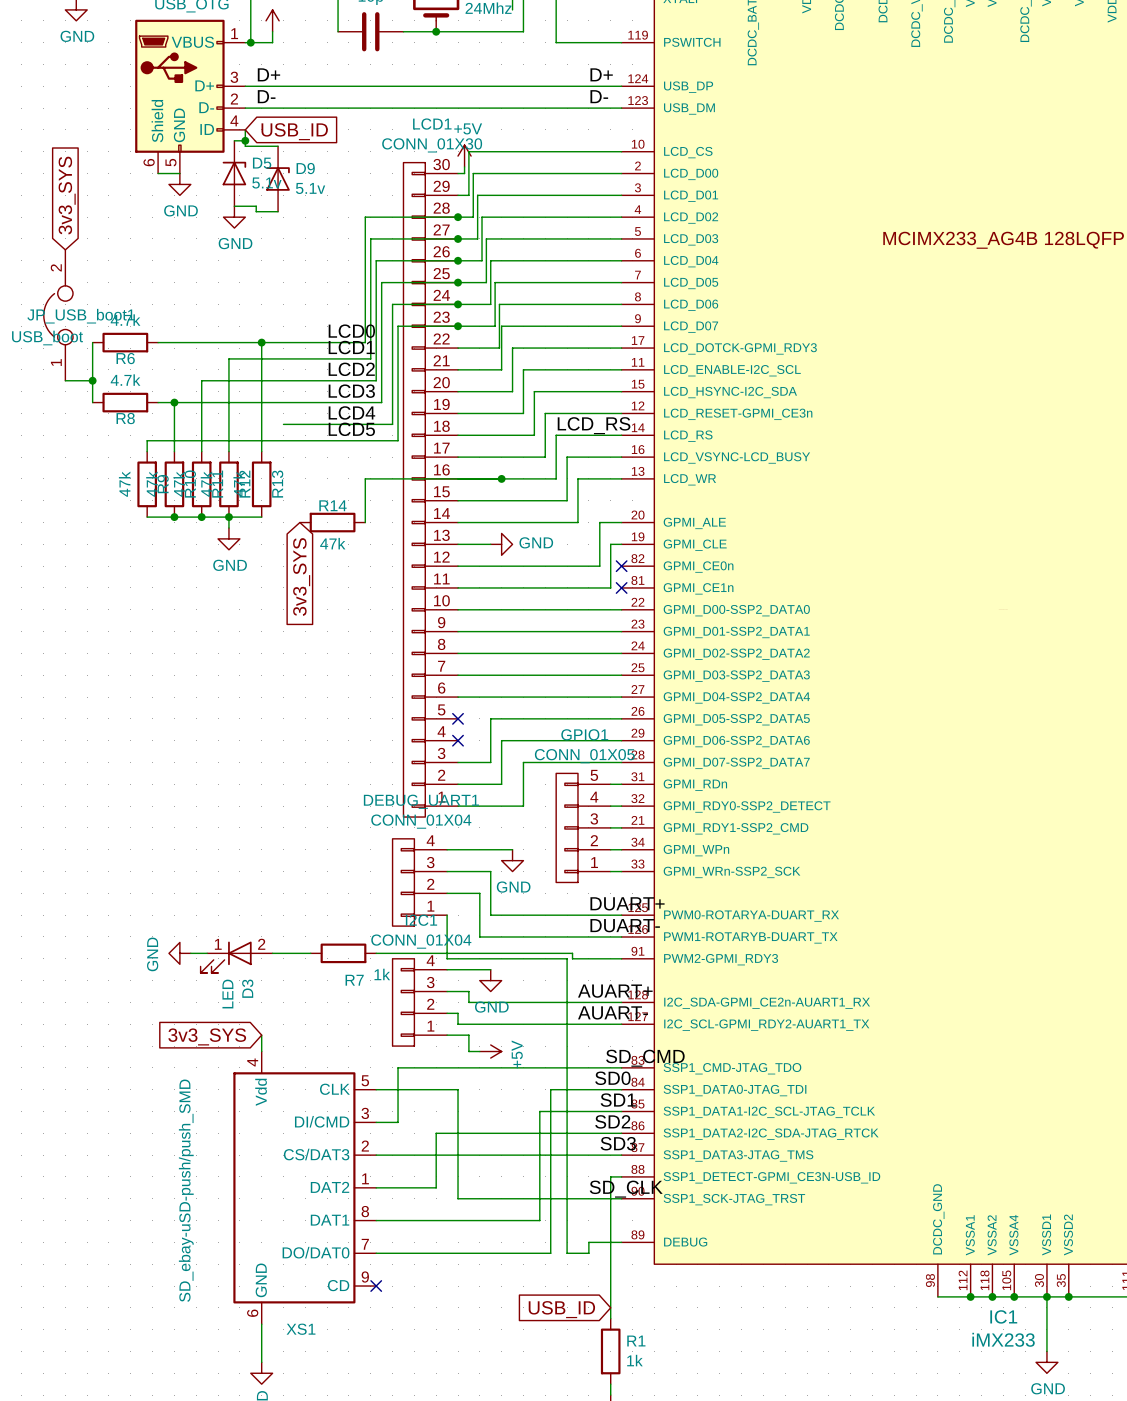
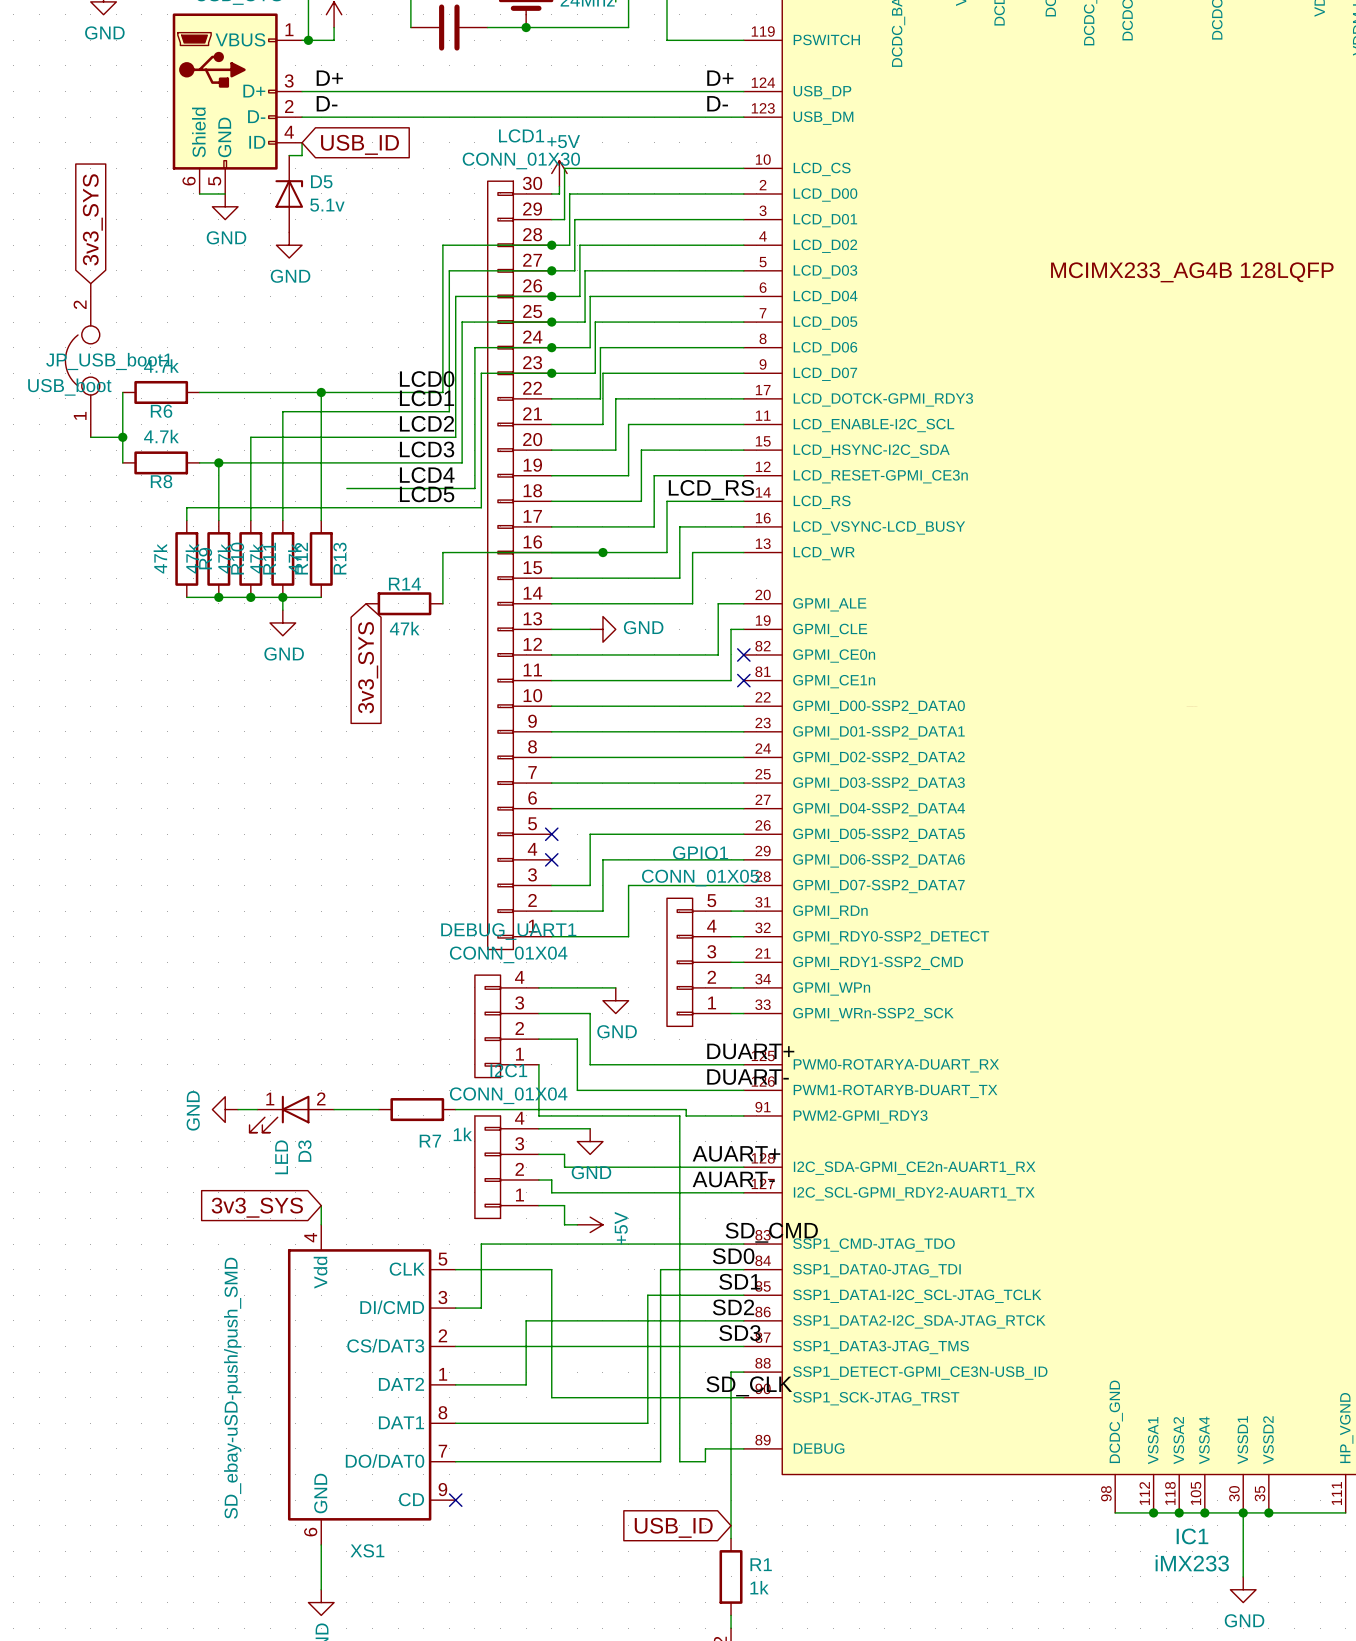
wire: (245, 140) (245, 146) (278, 146) -> none
junction: (245, 140) -> none
D9: 5.1v (278, 178) -> none
wire: (234, 206) (256, 206) (256, 211) (278, 211) -> none

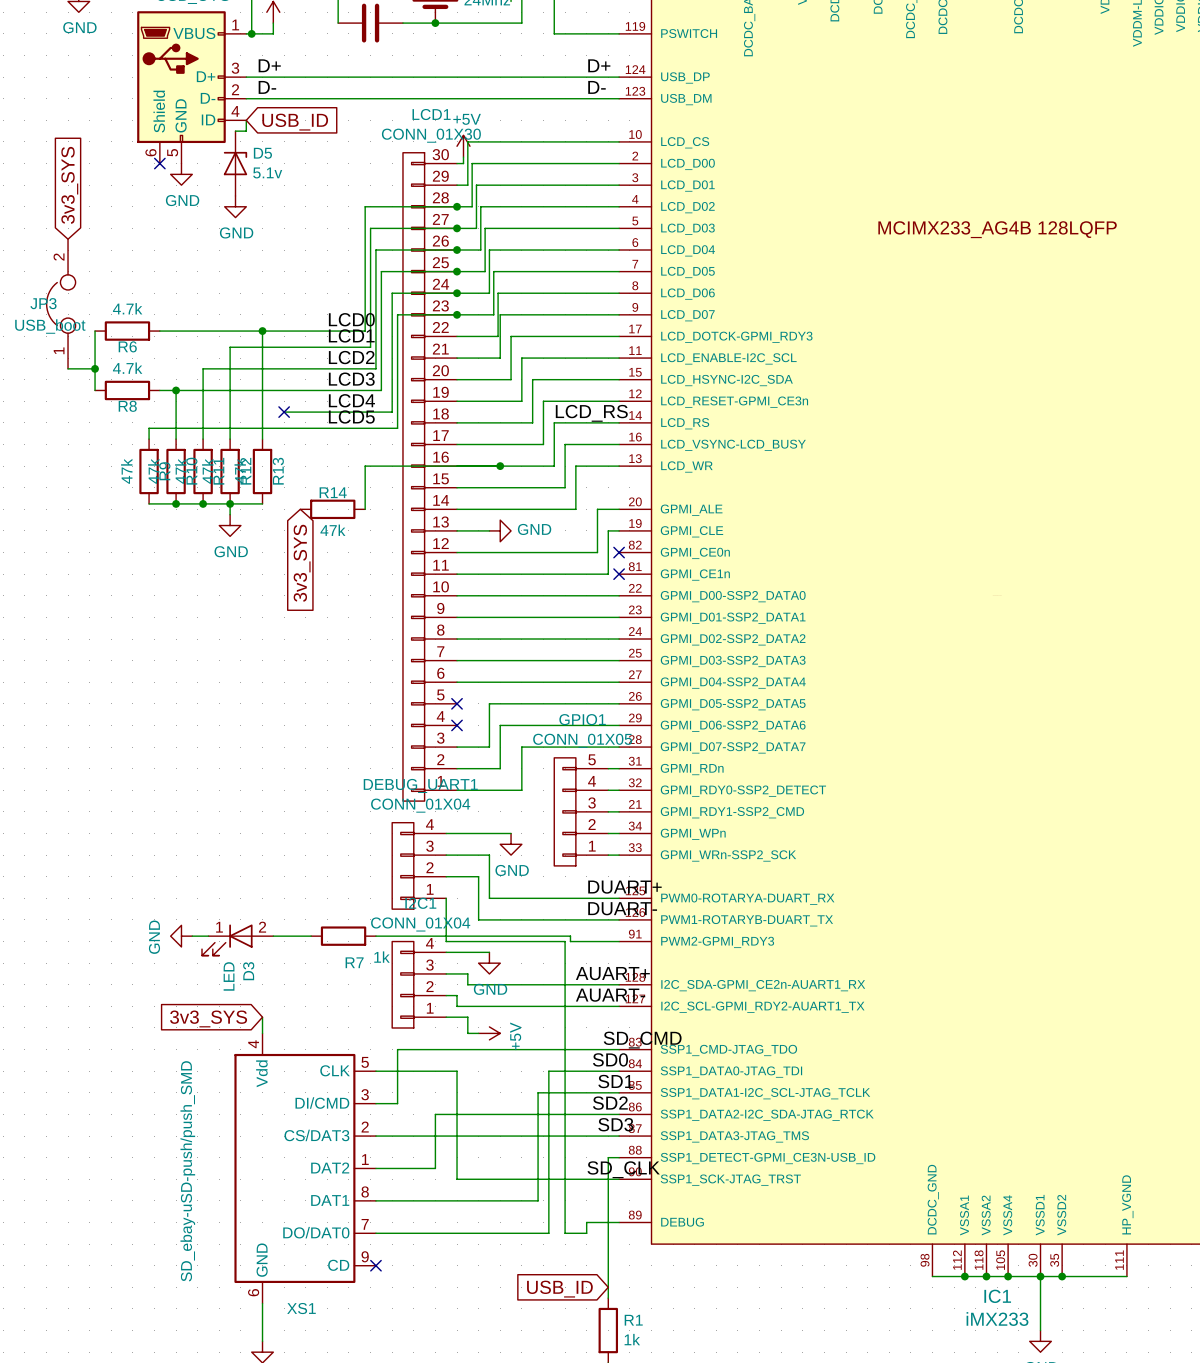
wire: (199, 193) (225, 193) -> none
no-connect mark: none -> (159, 163)
JP_USB_boot1 name: JP_USB_boot1 (109, 361) -> JP3 (43, 303)
no-connect mark: none -> (284, 412)

